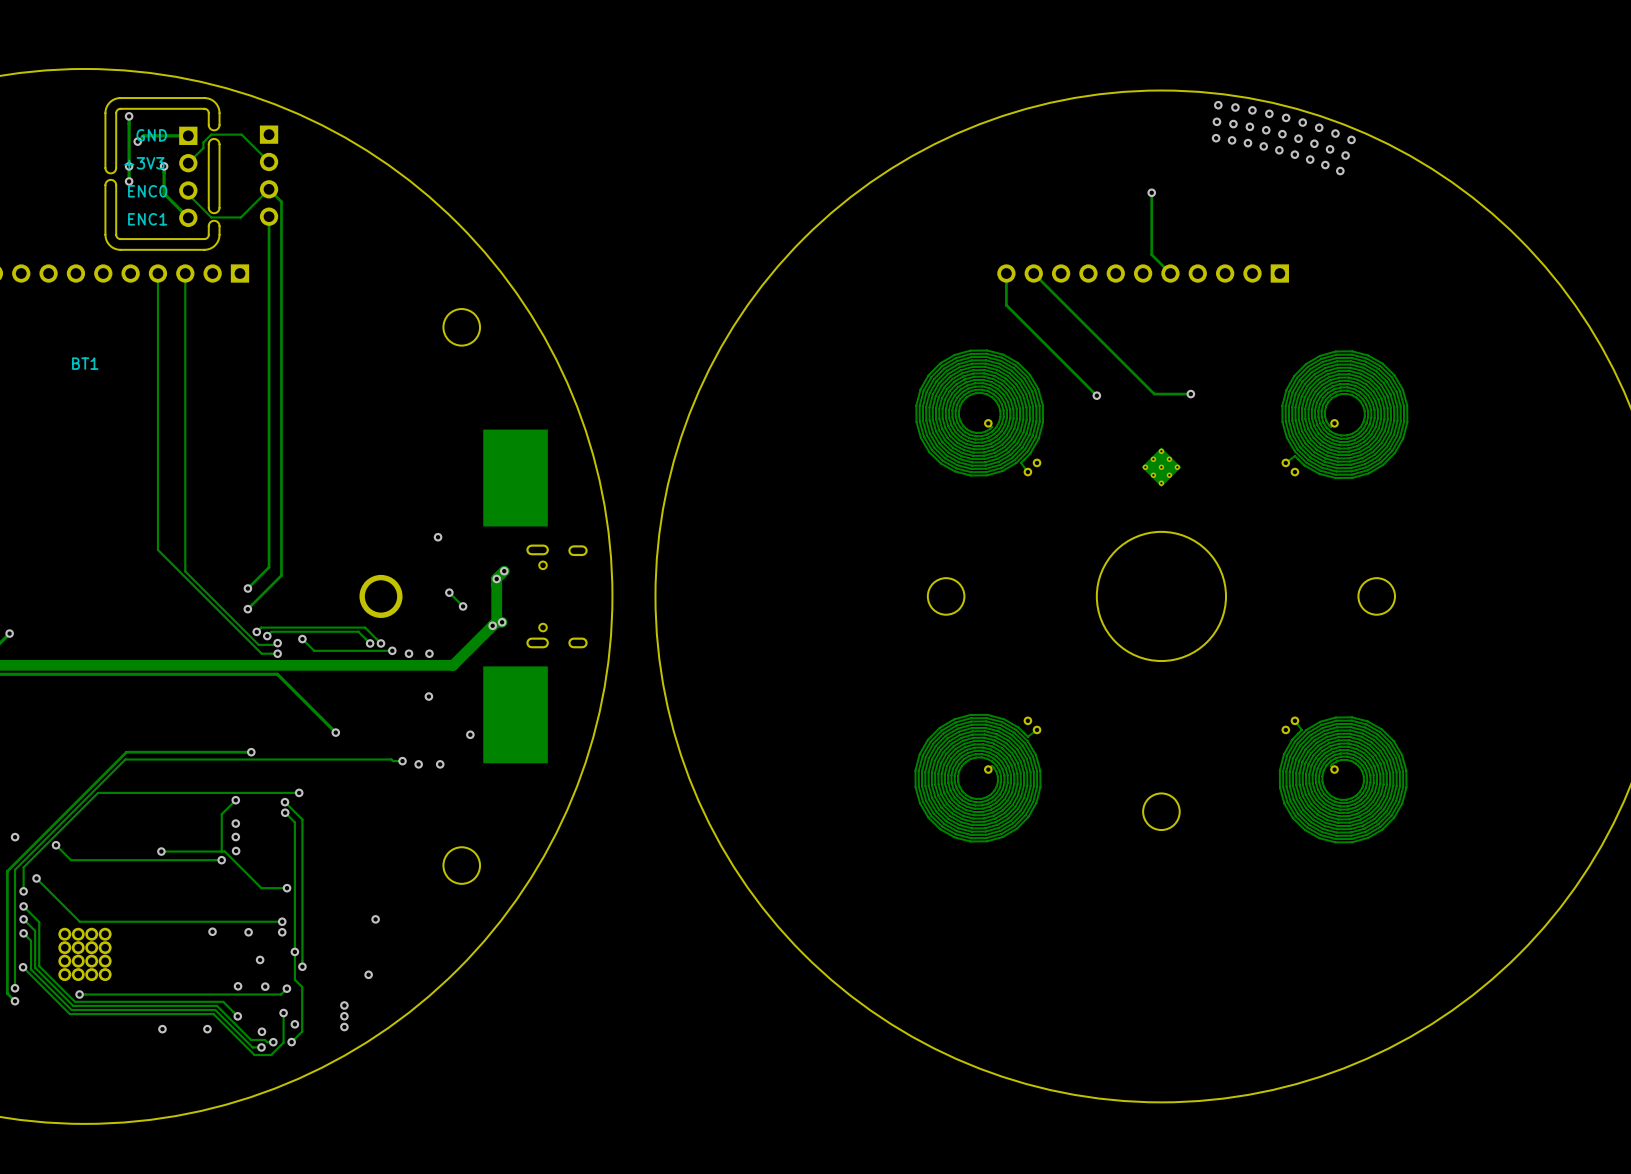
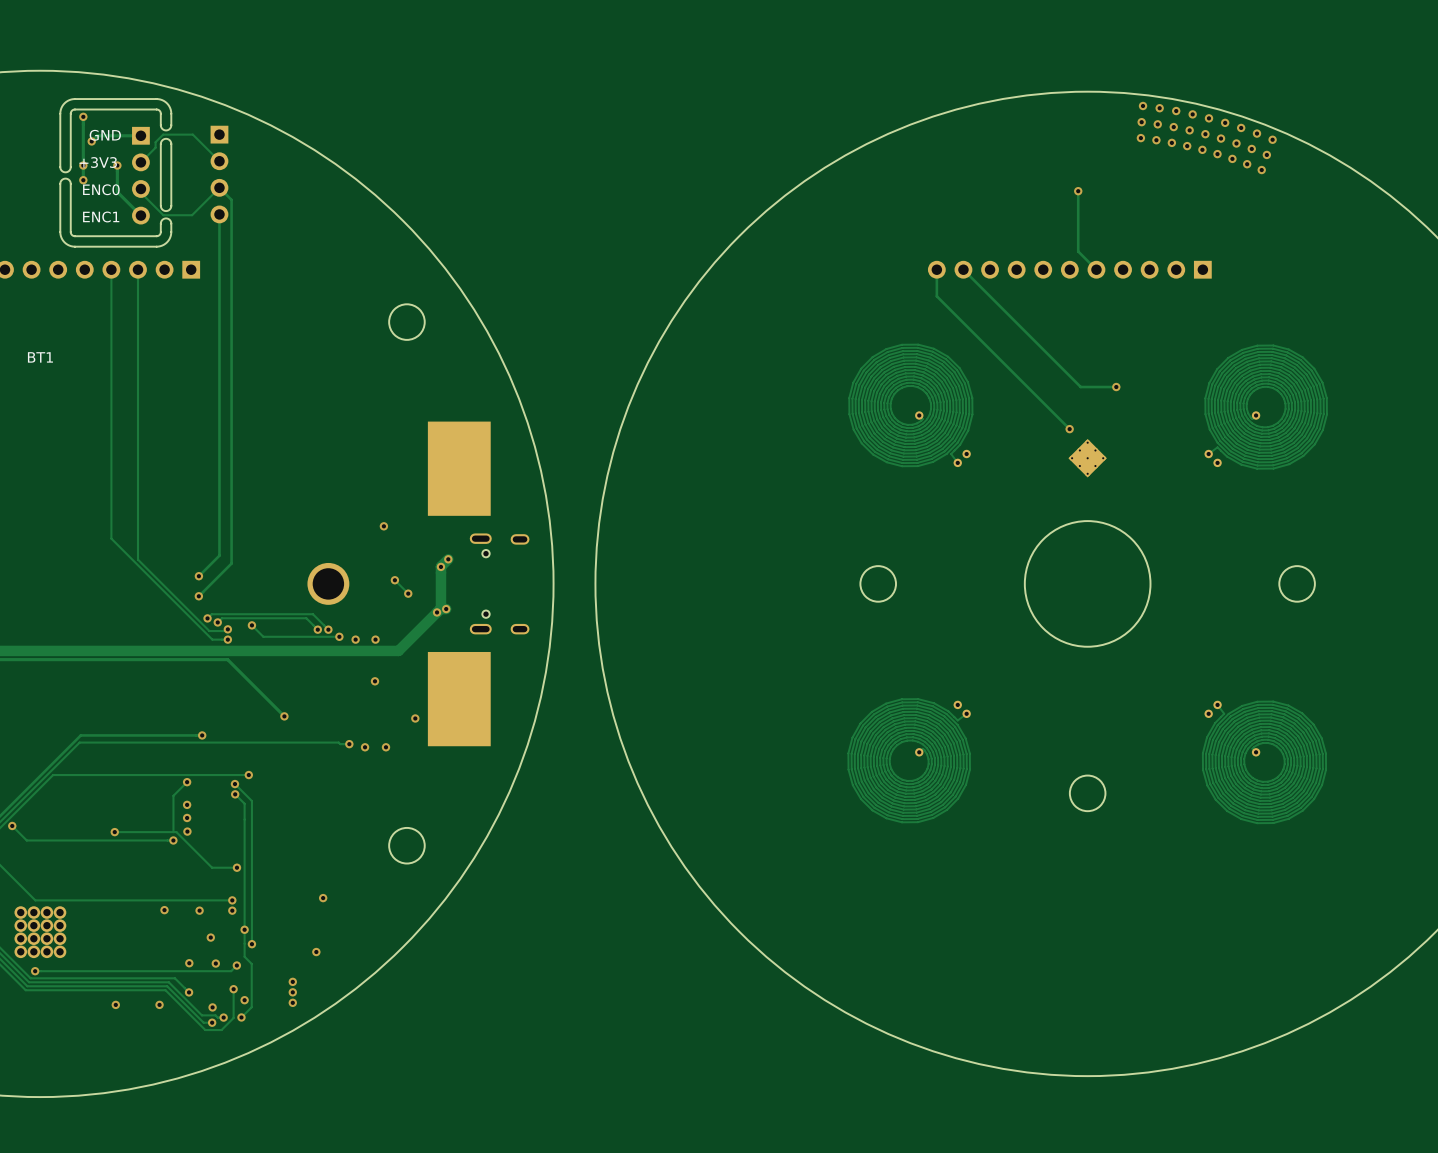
track: (1006, 300) (1006, 305) (1096, 395) -> (936, 296) (1069, 429)
via position: (1096, 395) -> (1069, 429)

